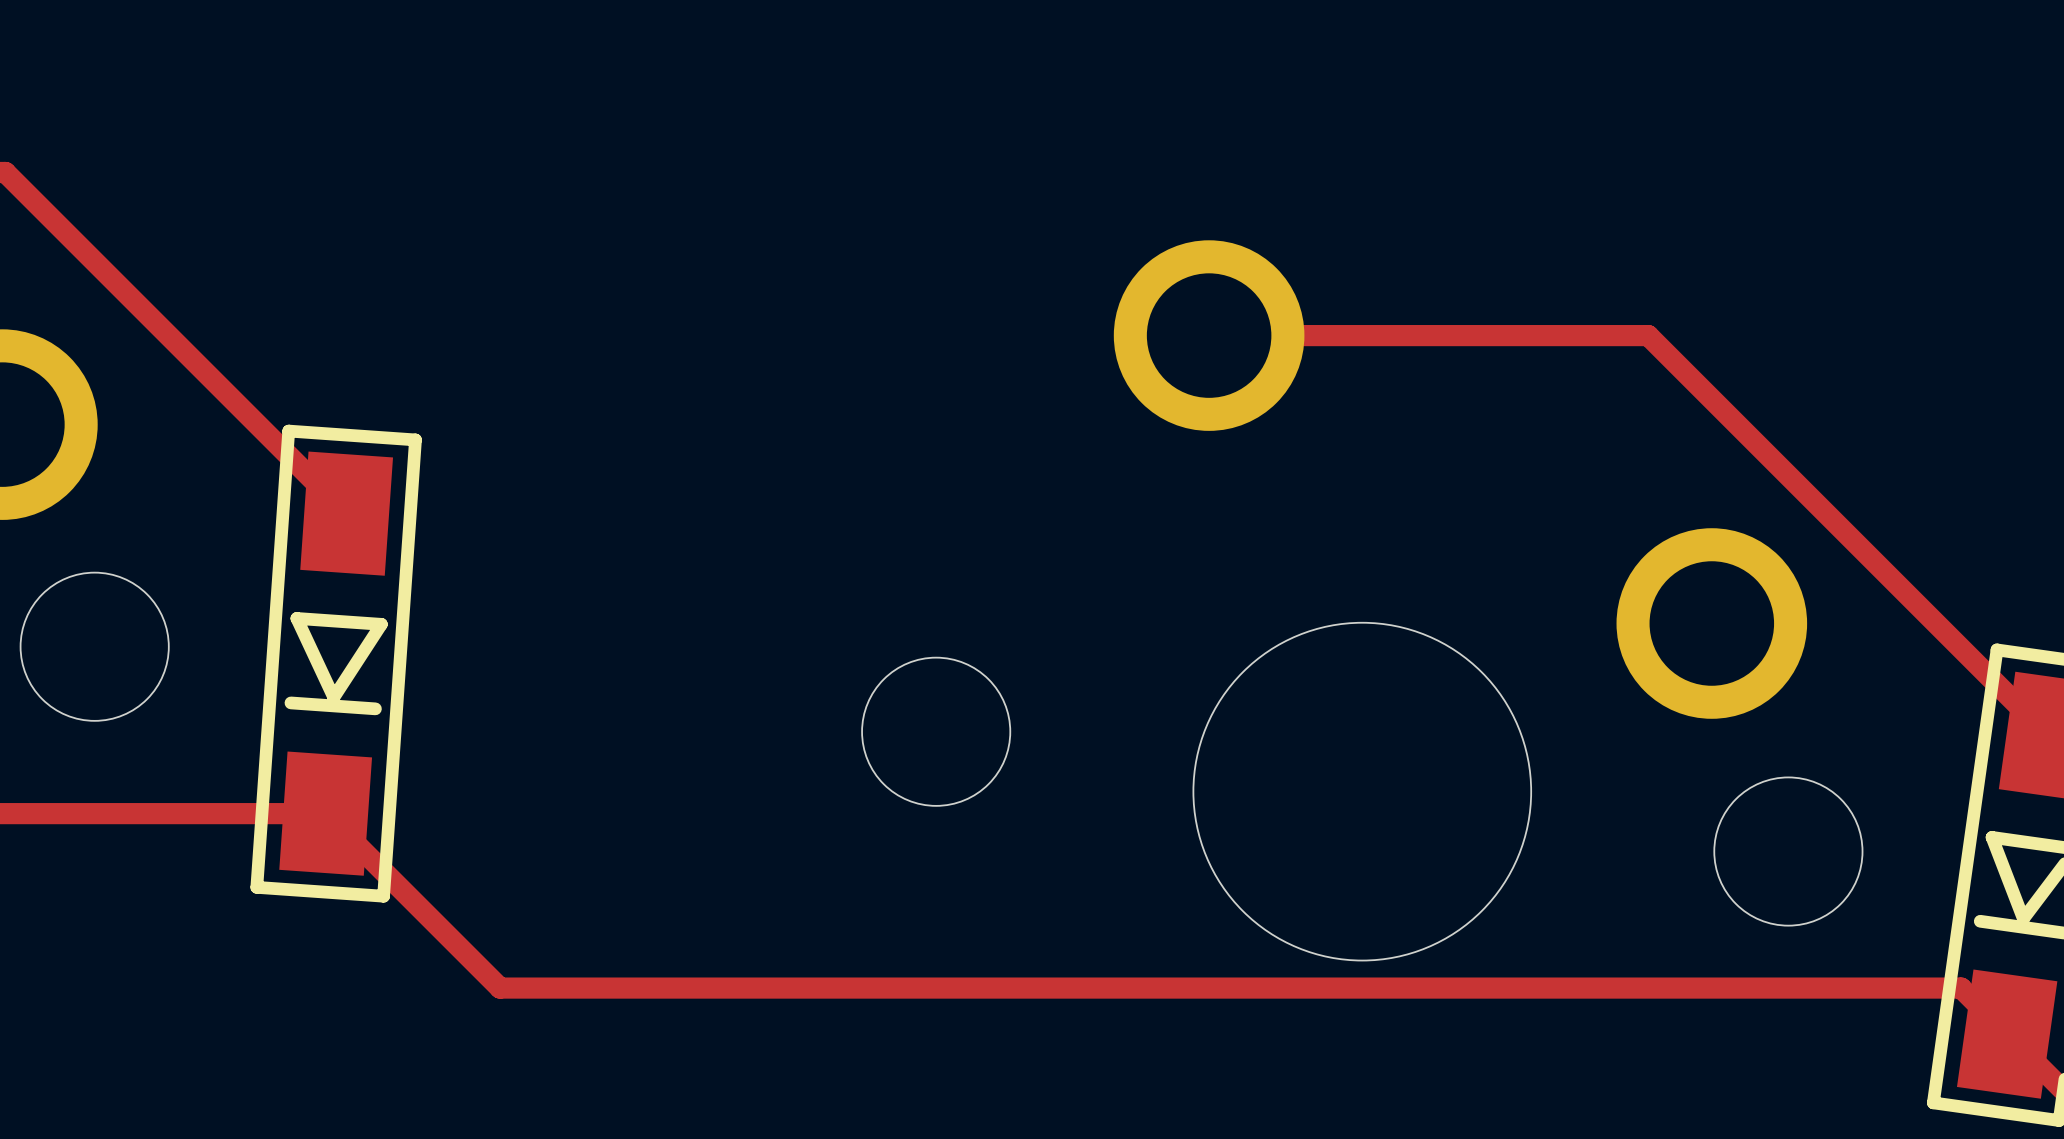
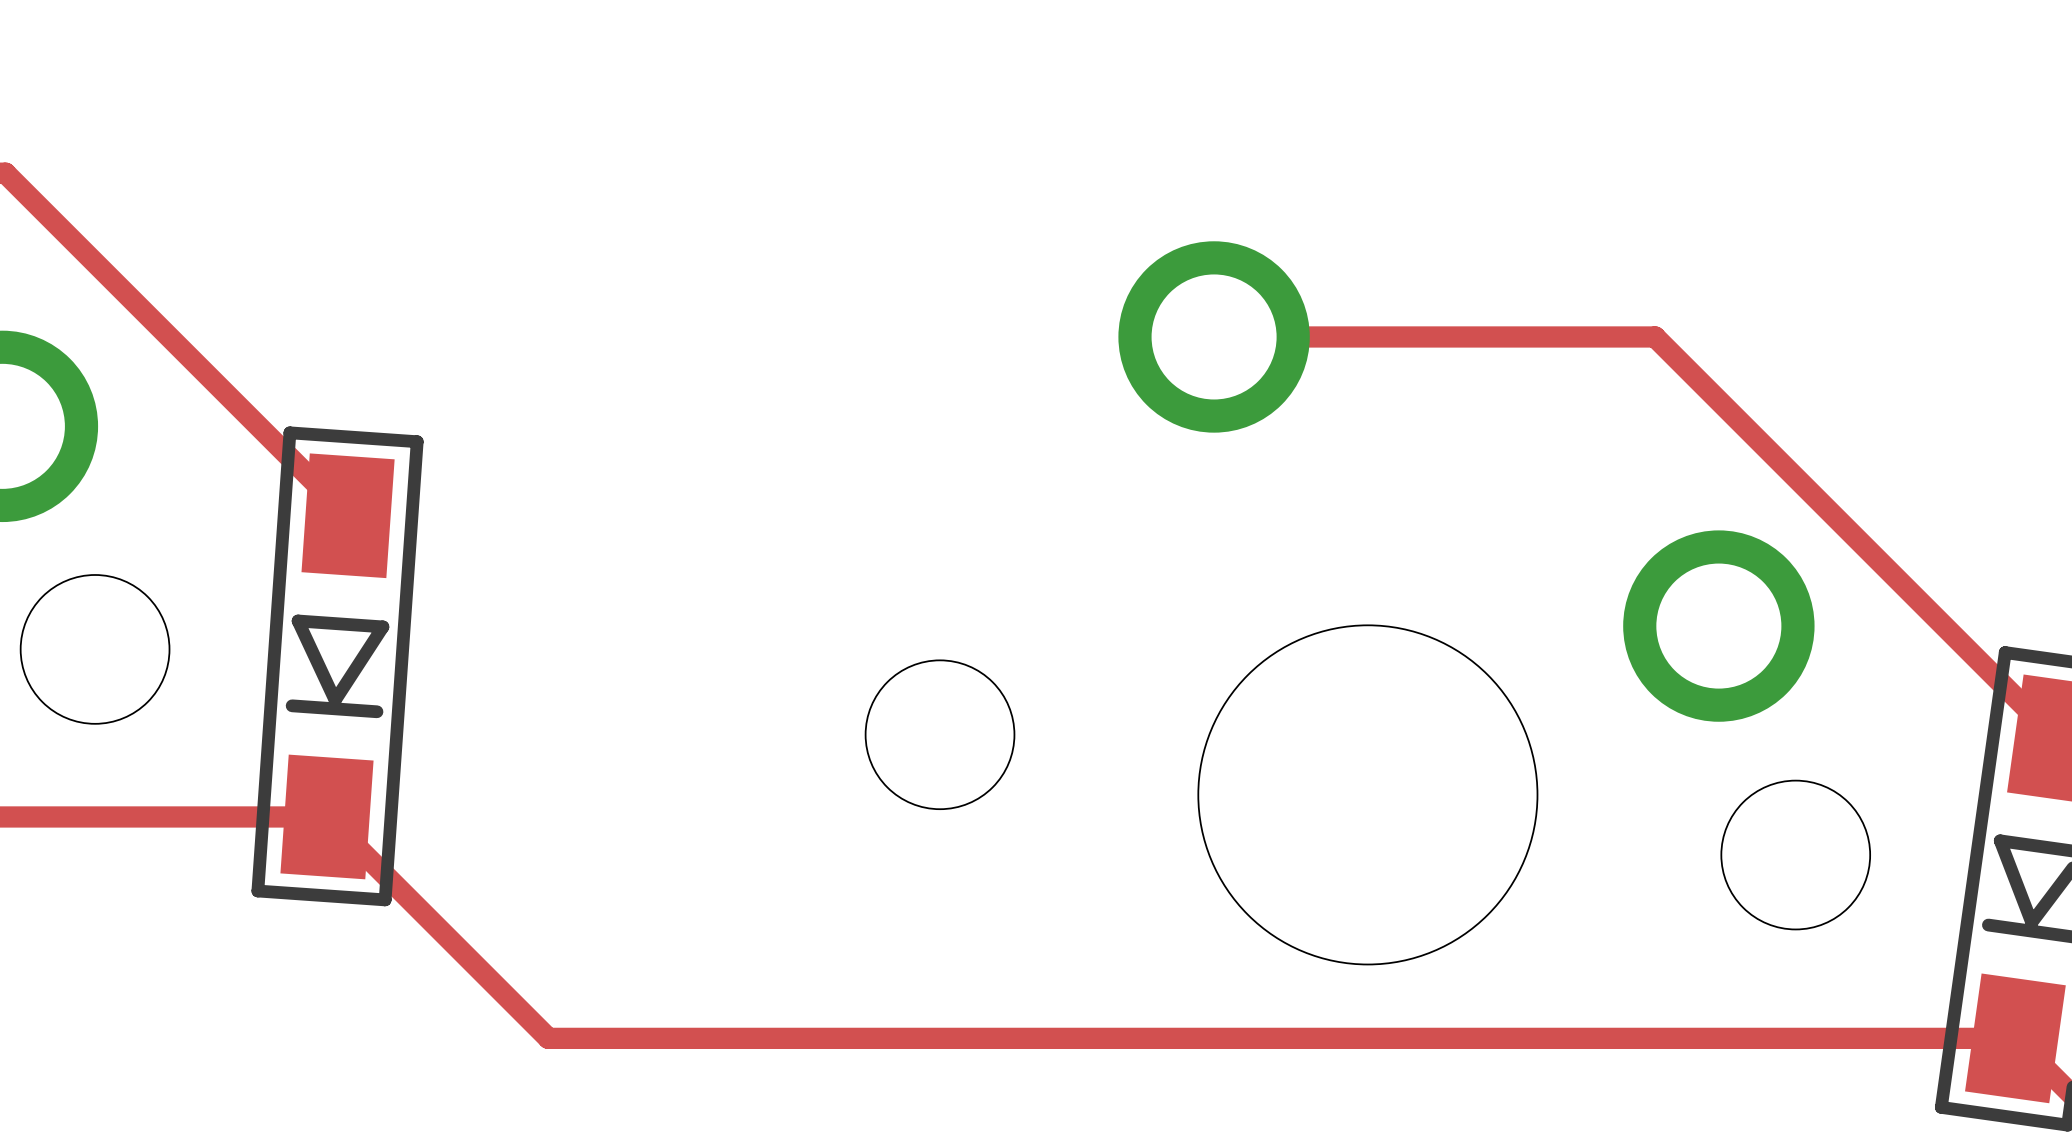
track: (500, 988) (1961, 988) (2007, 1034) -> (502, 992) (548, 1038) (2015, 1038)

